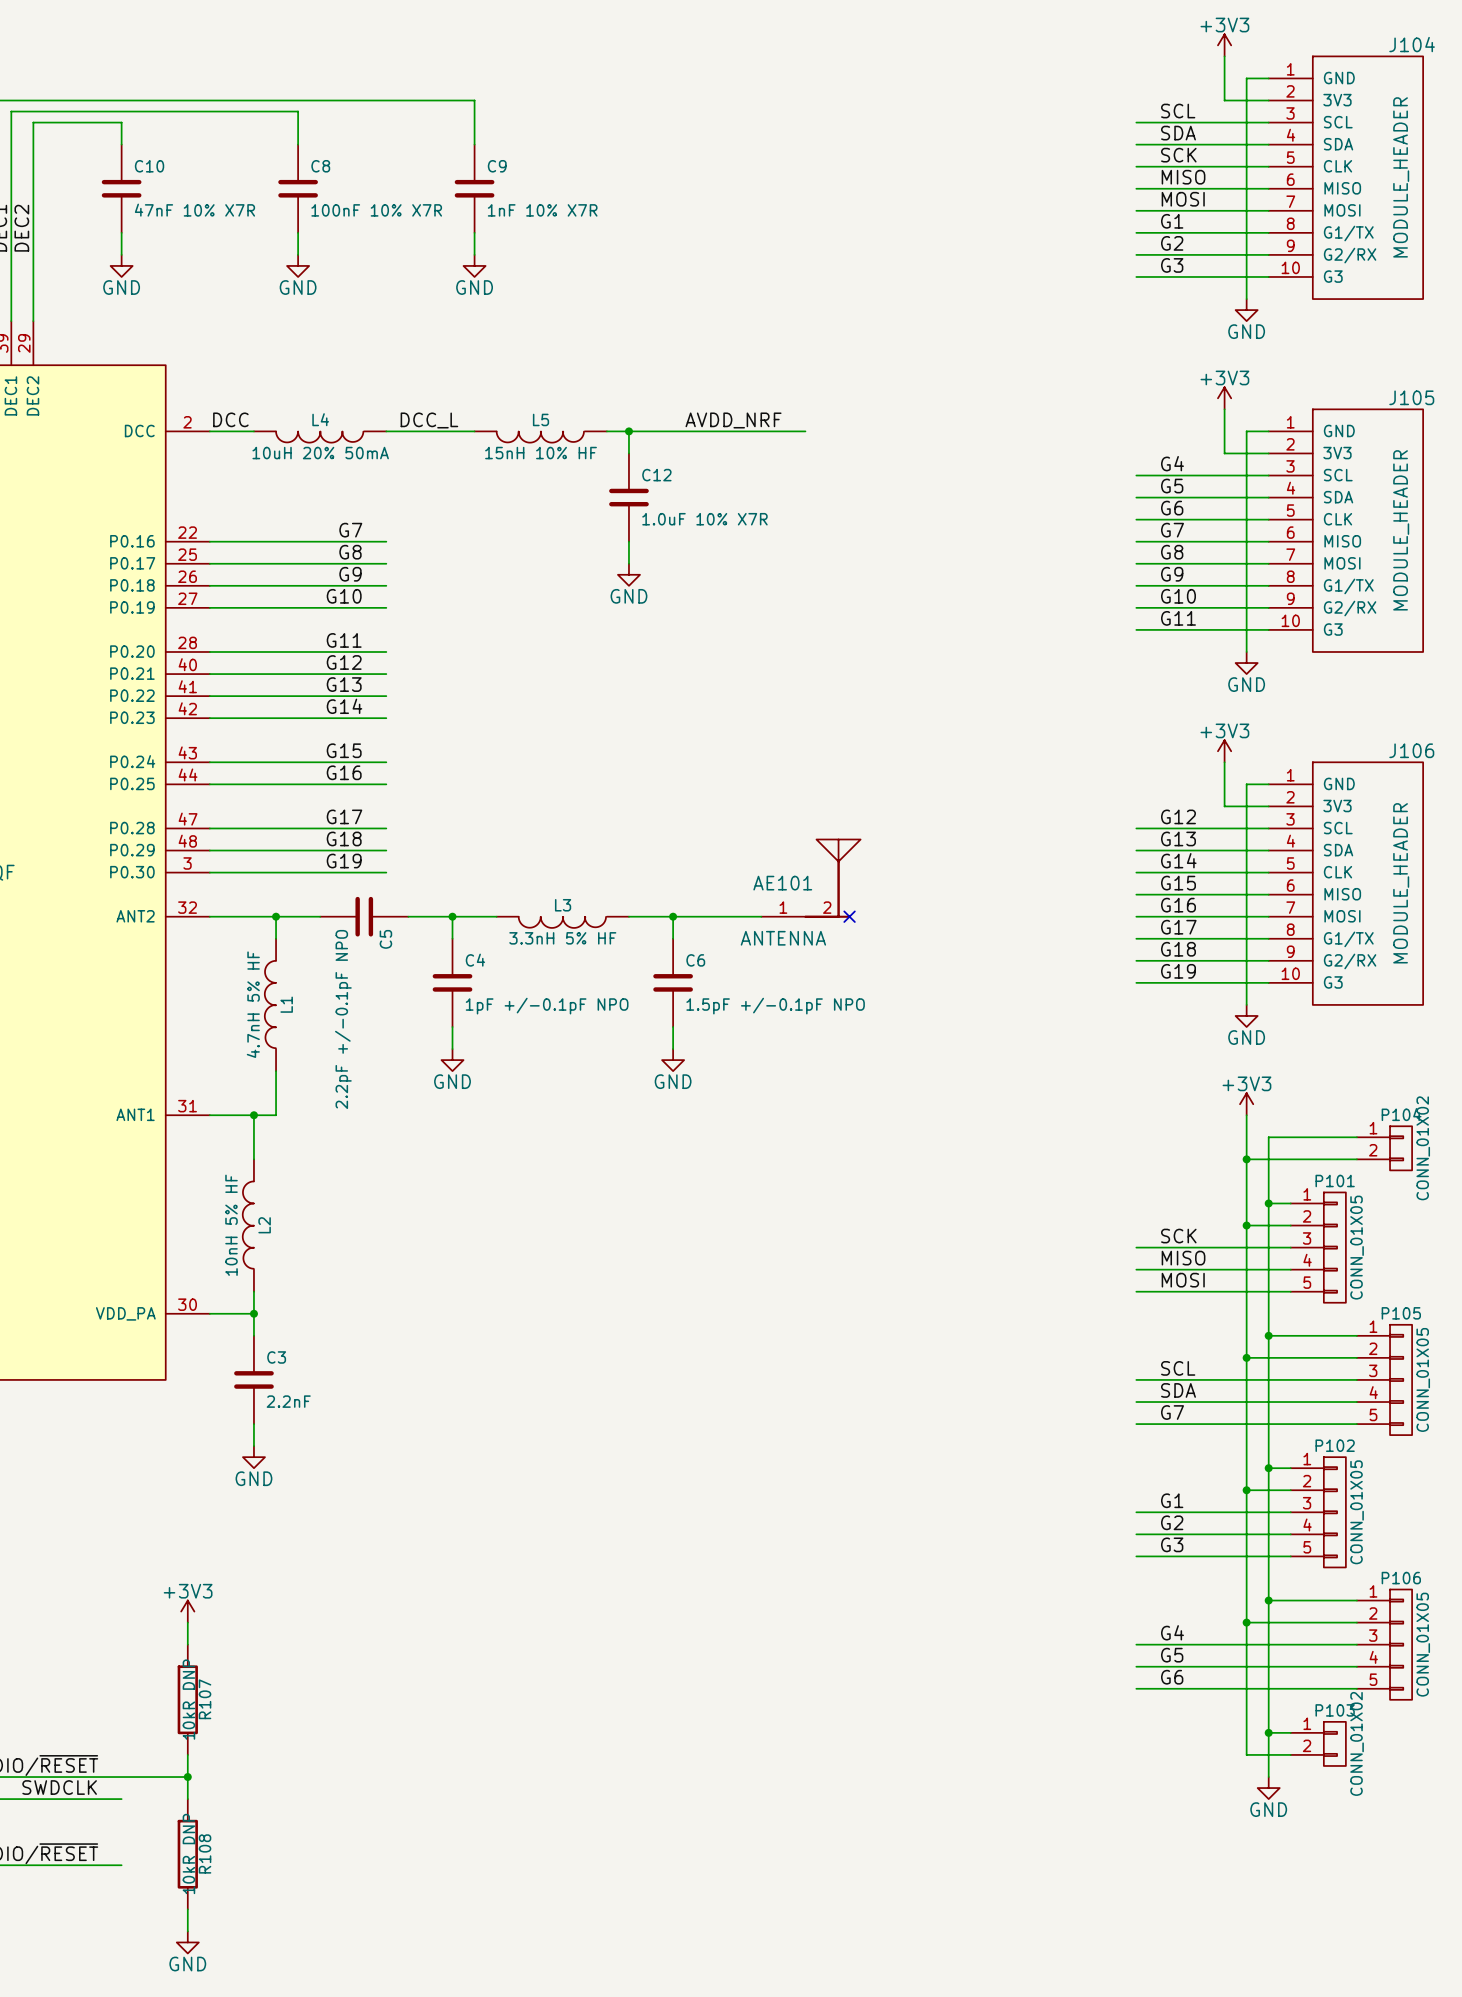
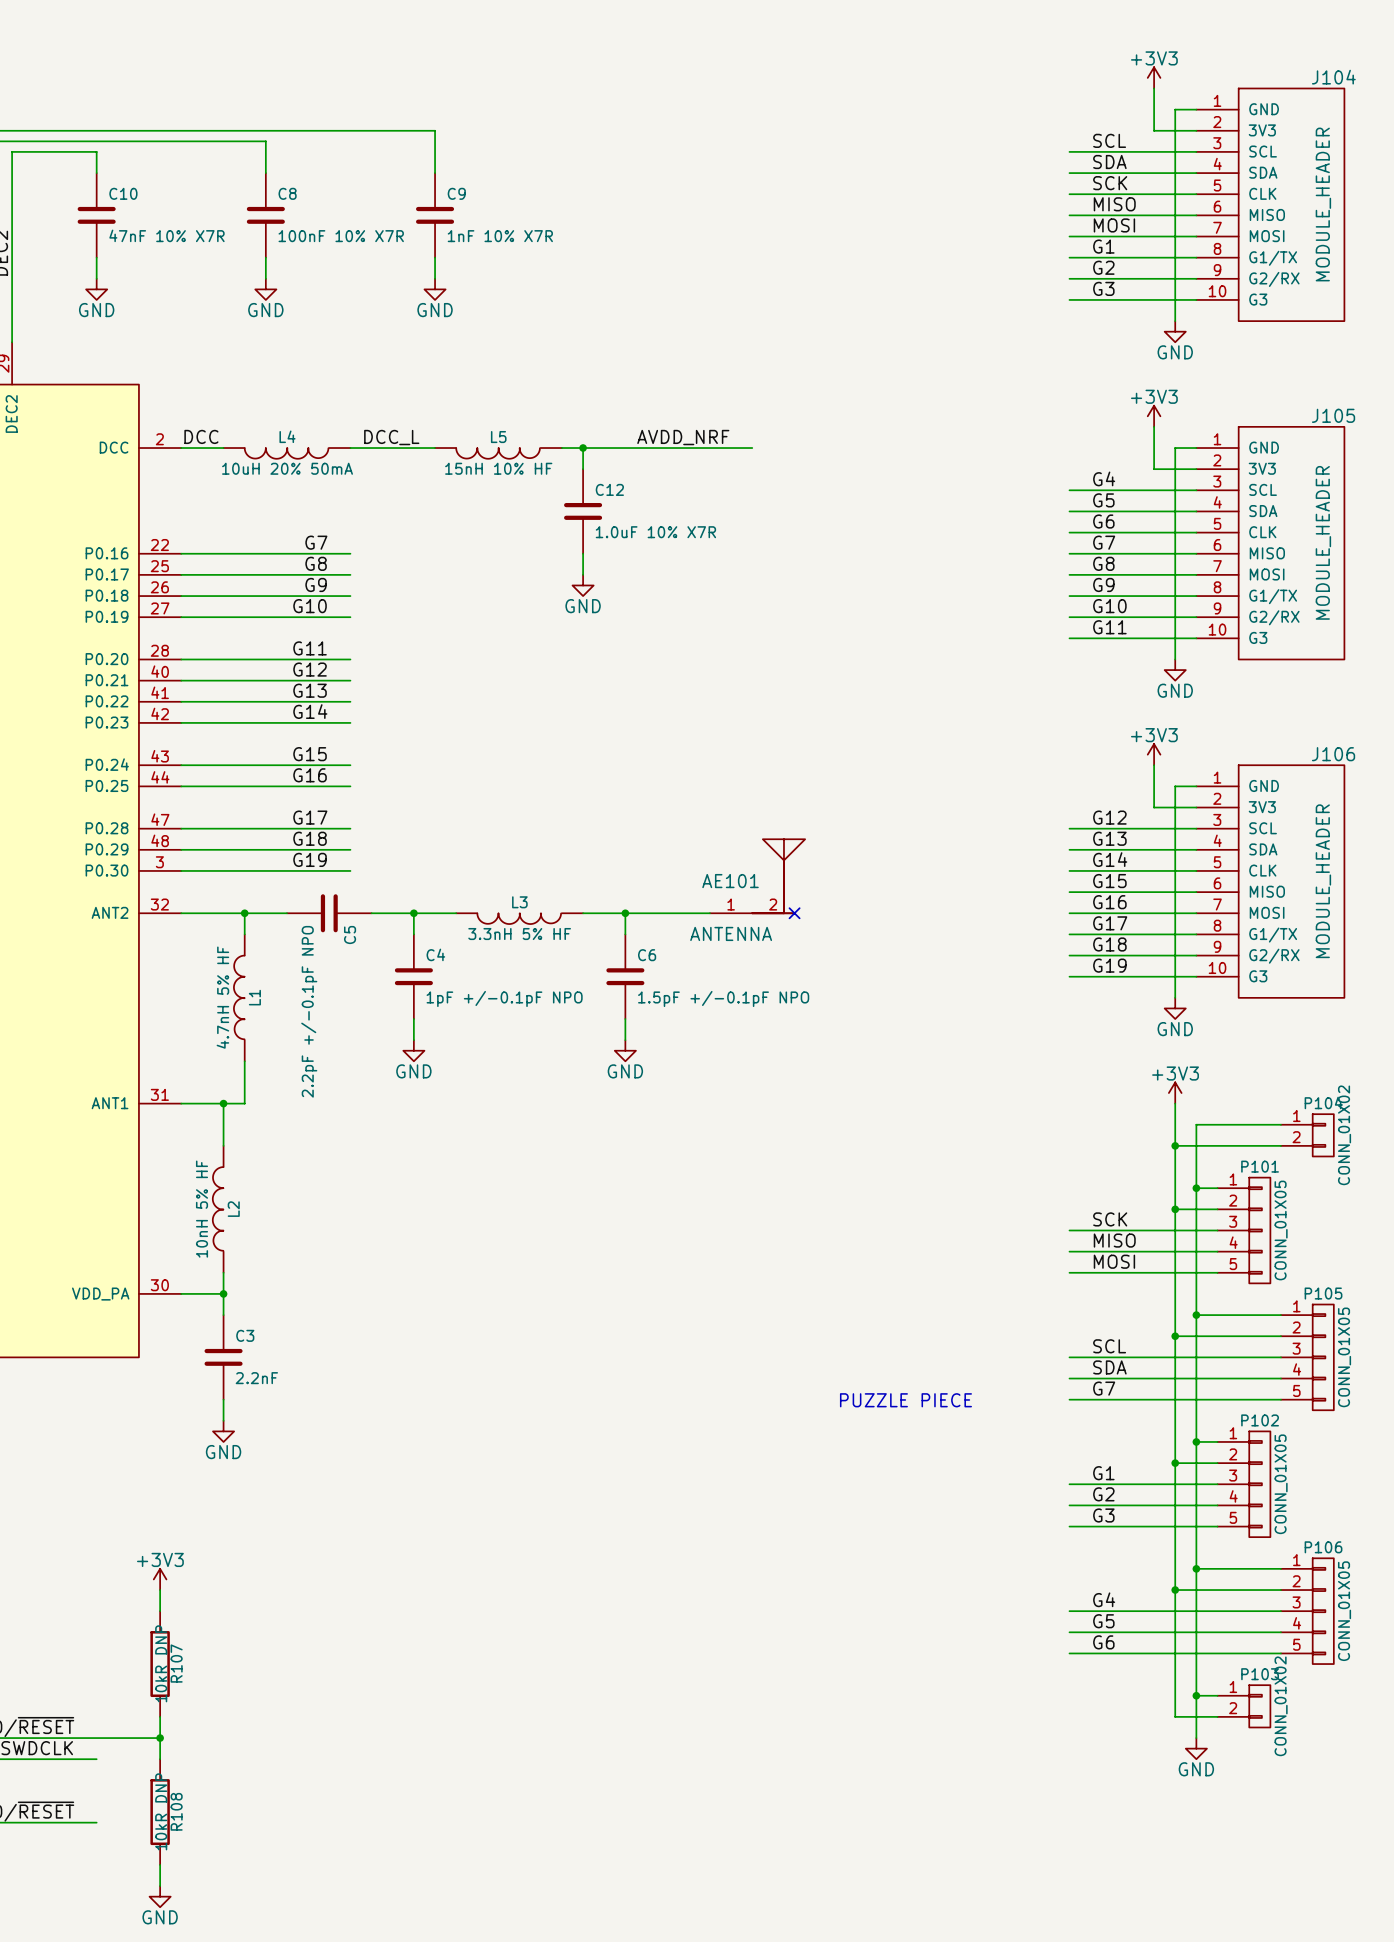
text: none -> PUZZLE PIECE (905, 1400)

